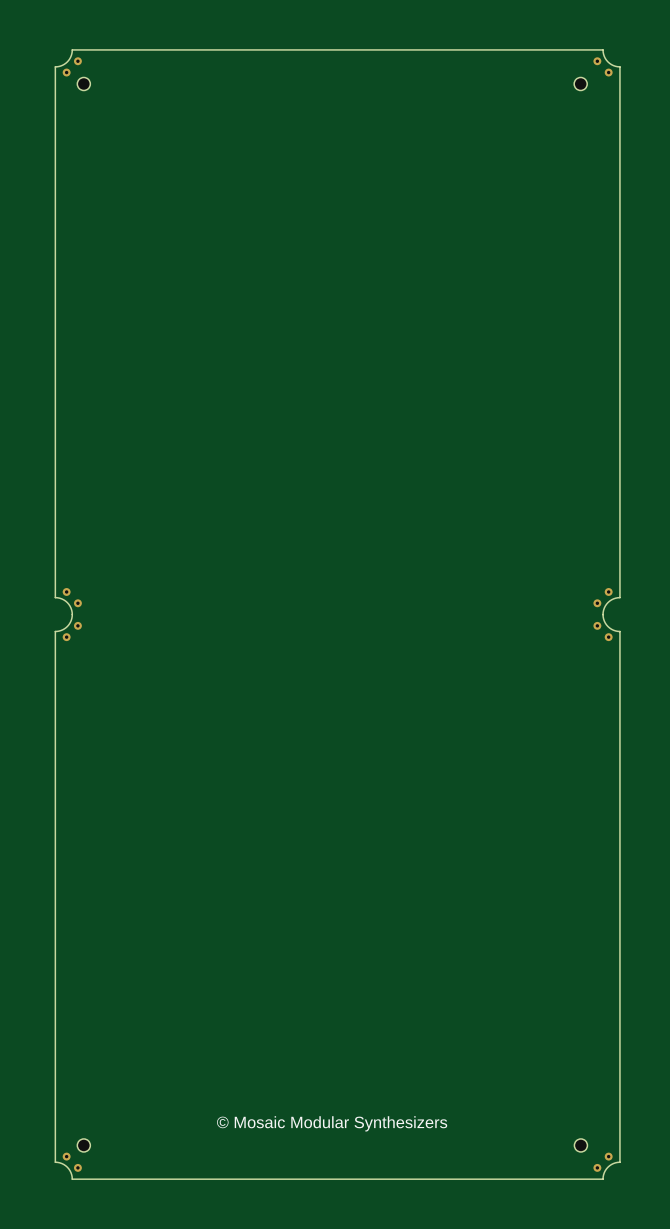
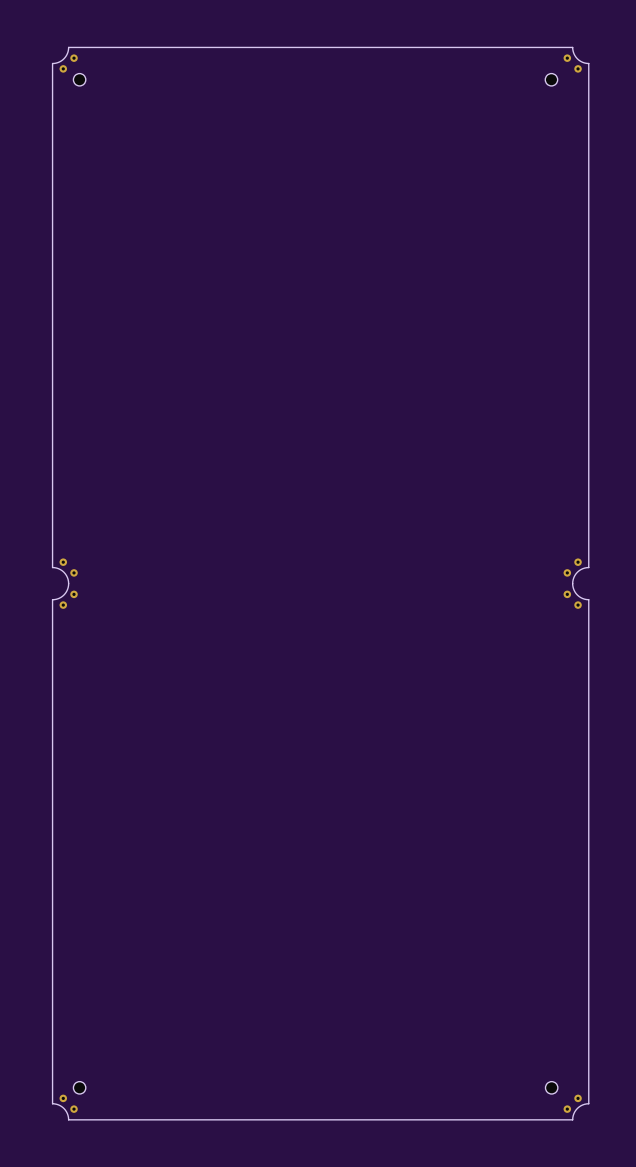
drawing: [216, 1116, 448, 1132] -> none

